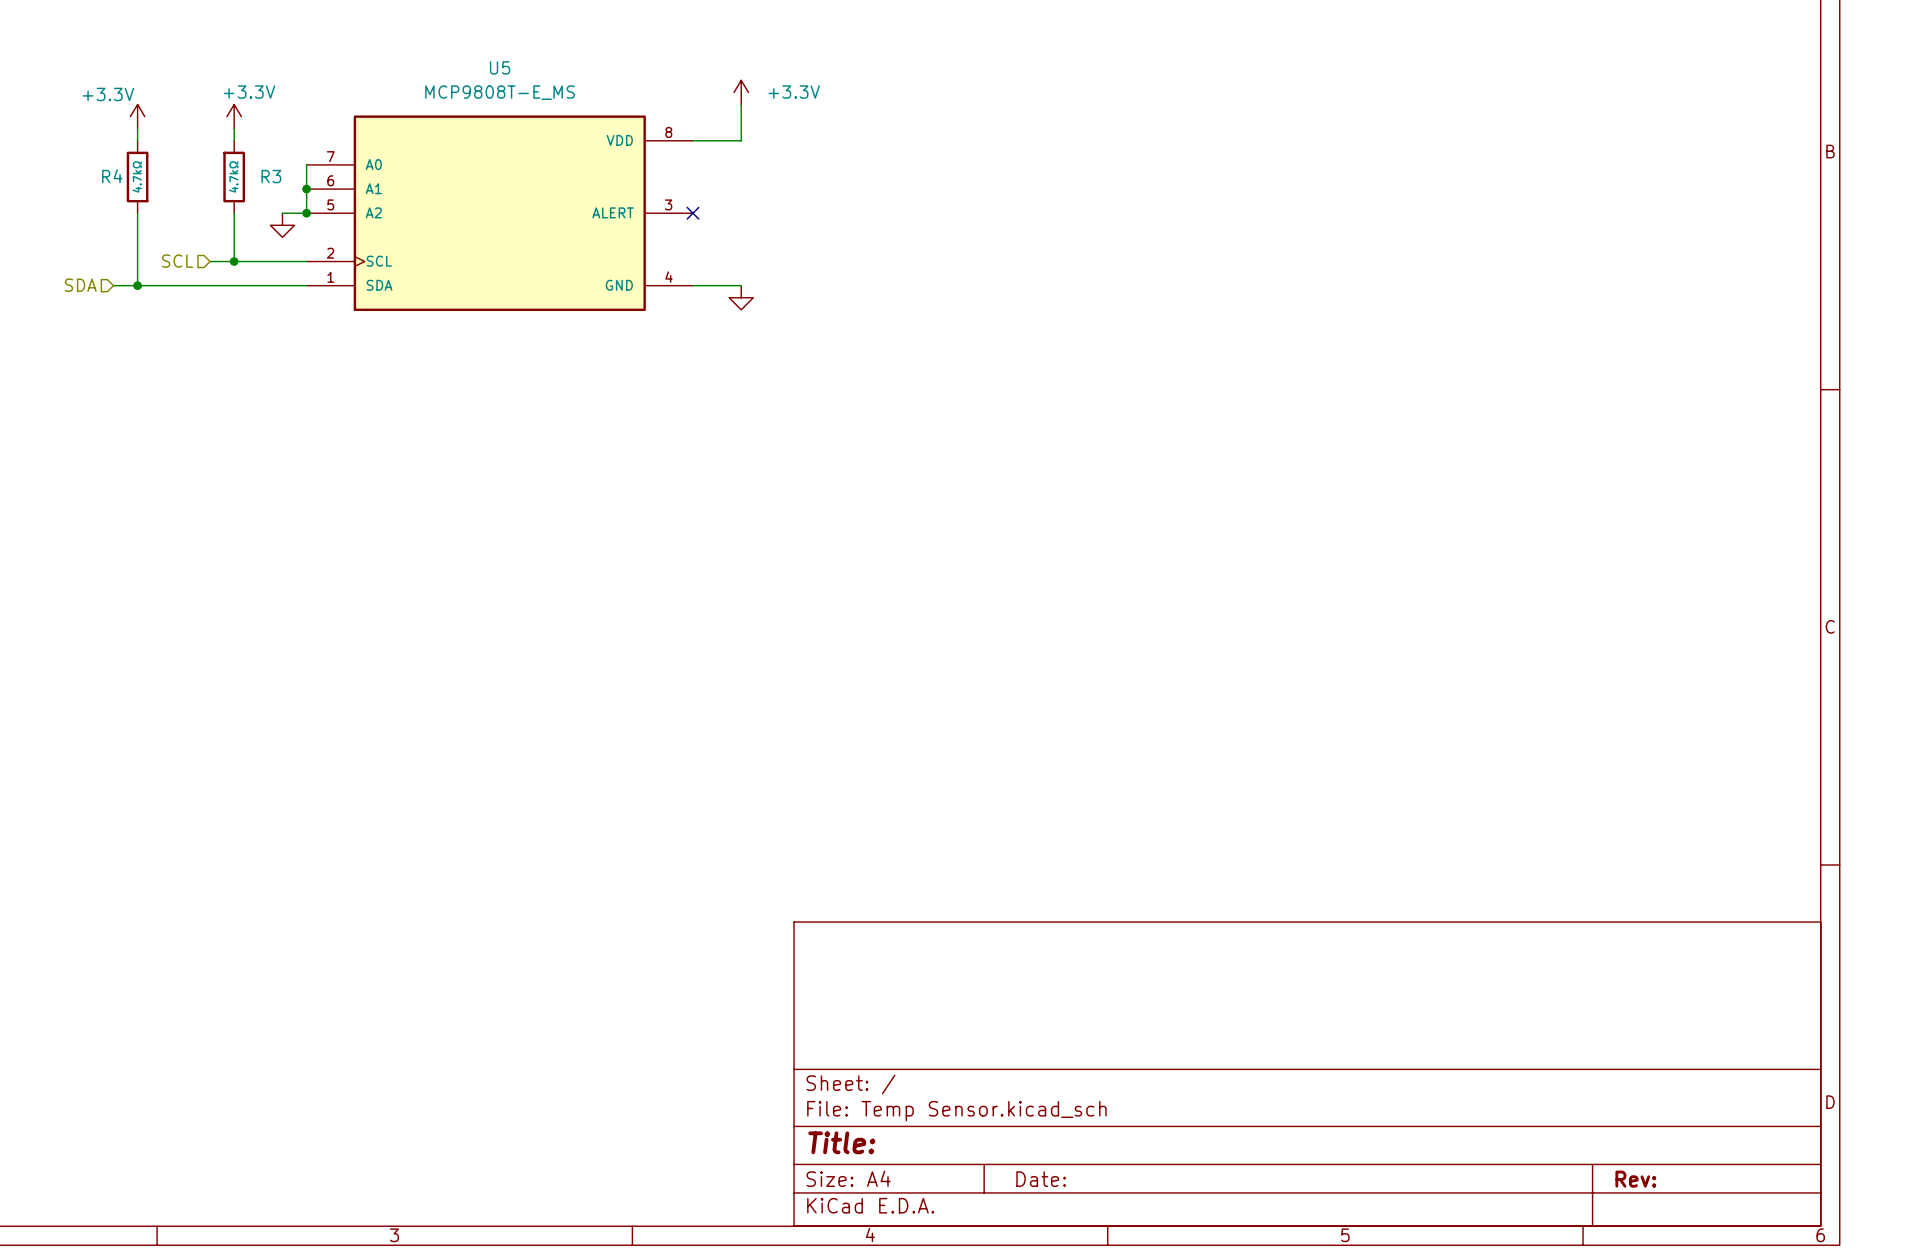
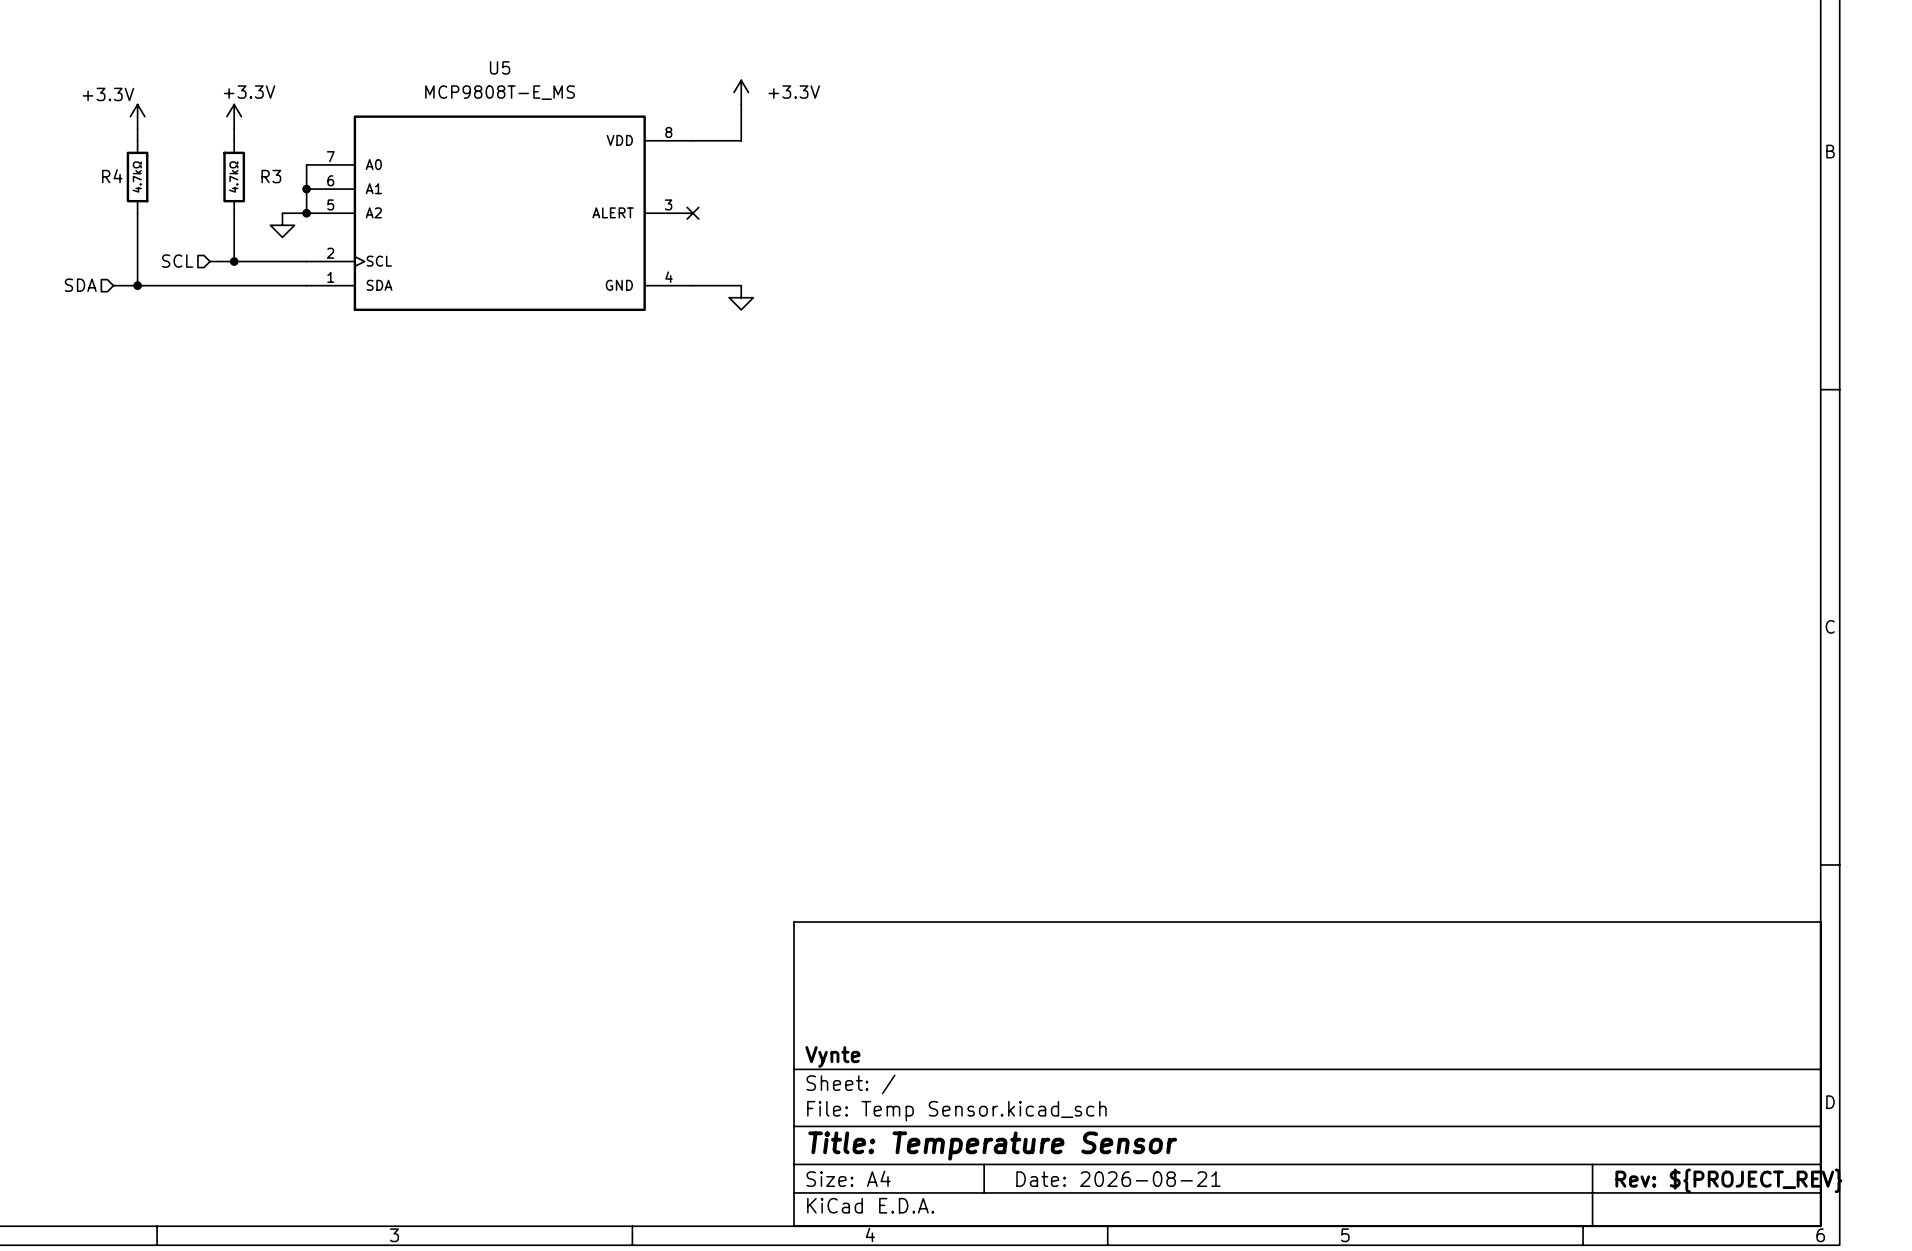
title block: none -> Vynte (832, 1056)
title block: Title: (841, 1142) -> Title: Temperature Sensor (992, 1145)
title block: Date: (1041, 1179) -> Date: 2026-08-21 (1118, 1179)
title block: Rev: (1635, 1179) -> Rev: ${PROJECT_REV} (1728, 1180)

